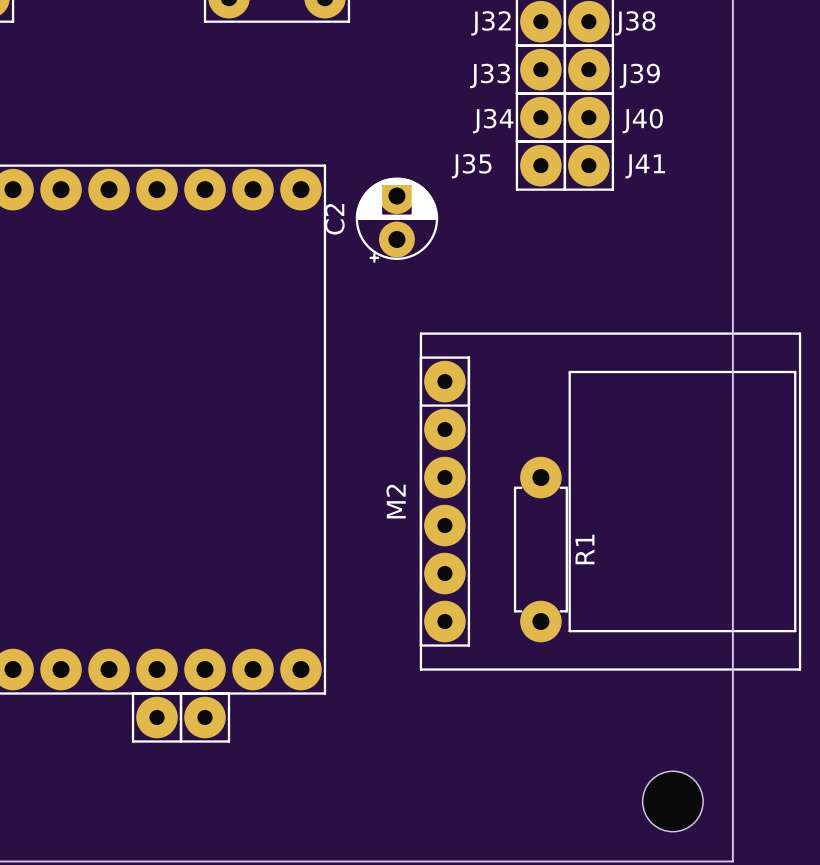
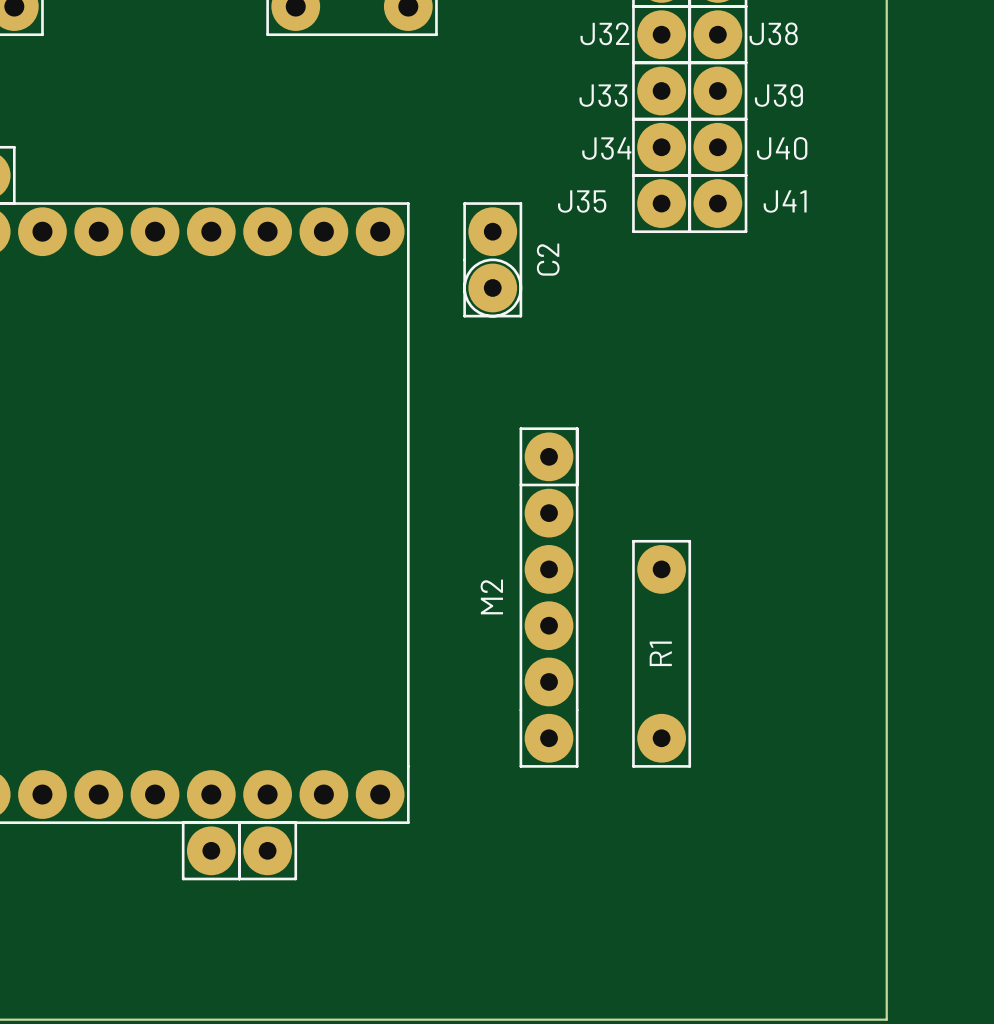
C2 footprint: [355, 177, 439, 263] -> [463, 202, 523, 318]
C2 name position: C2 (334, 219) -> C2 (548, 259)
M2 footprint: [419, 332, 802, 671] -> [519, 427, 579, 768]
R1 footprint: [513, 456, 568, 643] -> [632, 539, 692, 768]
R1 name position: R1 (584, 549) -> R1 (660, 653)
part: (672, 801) -> none

